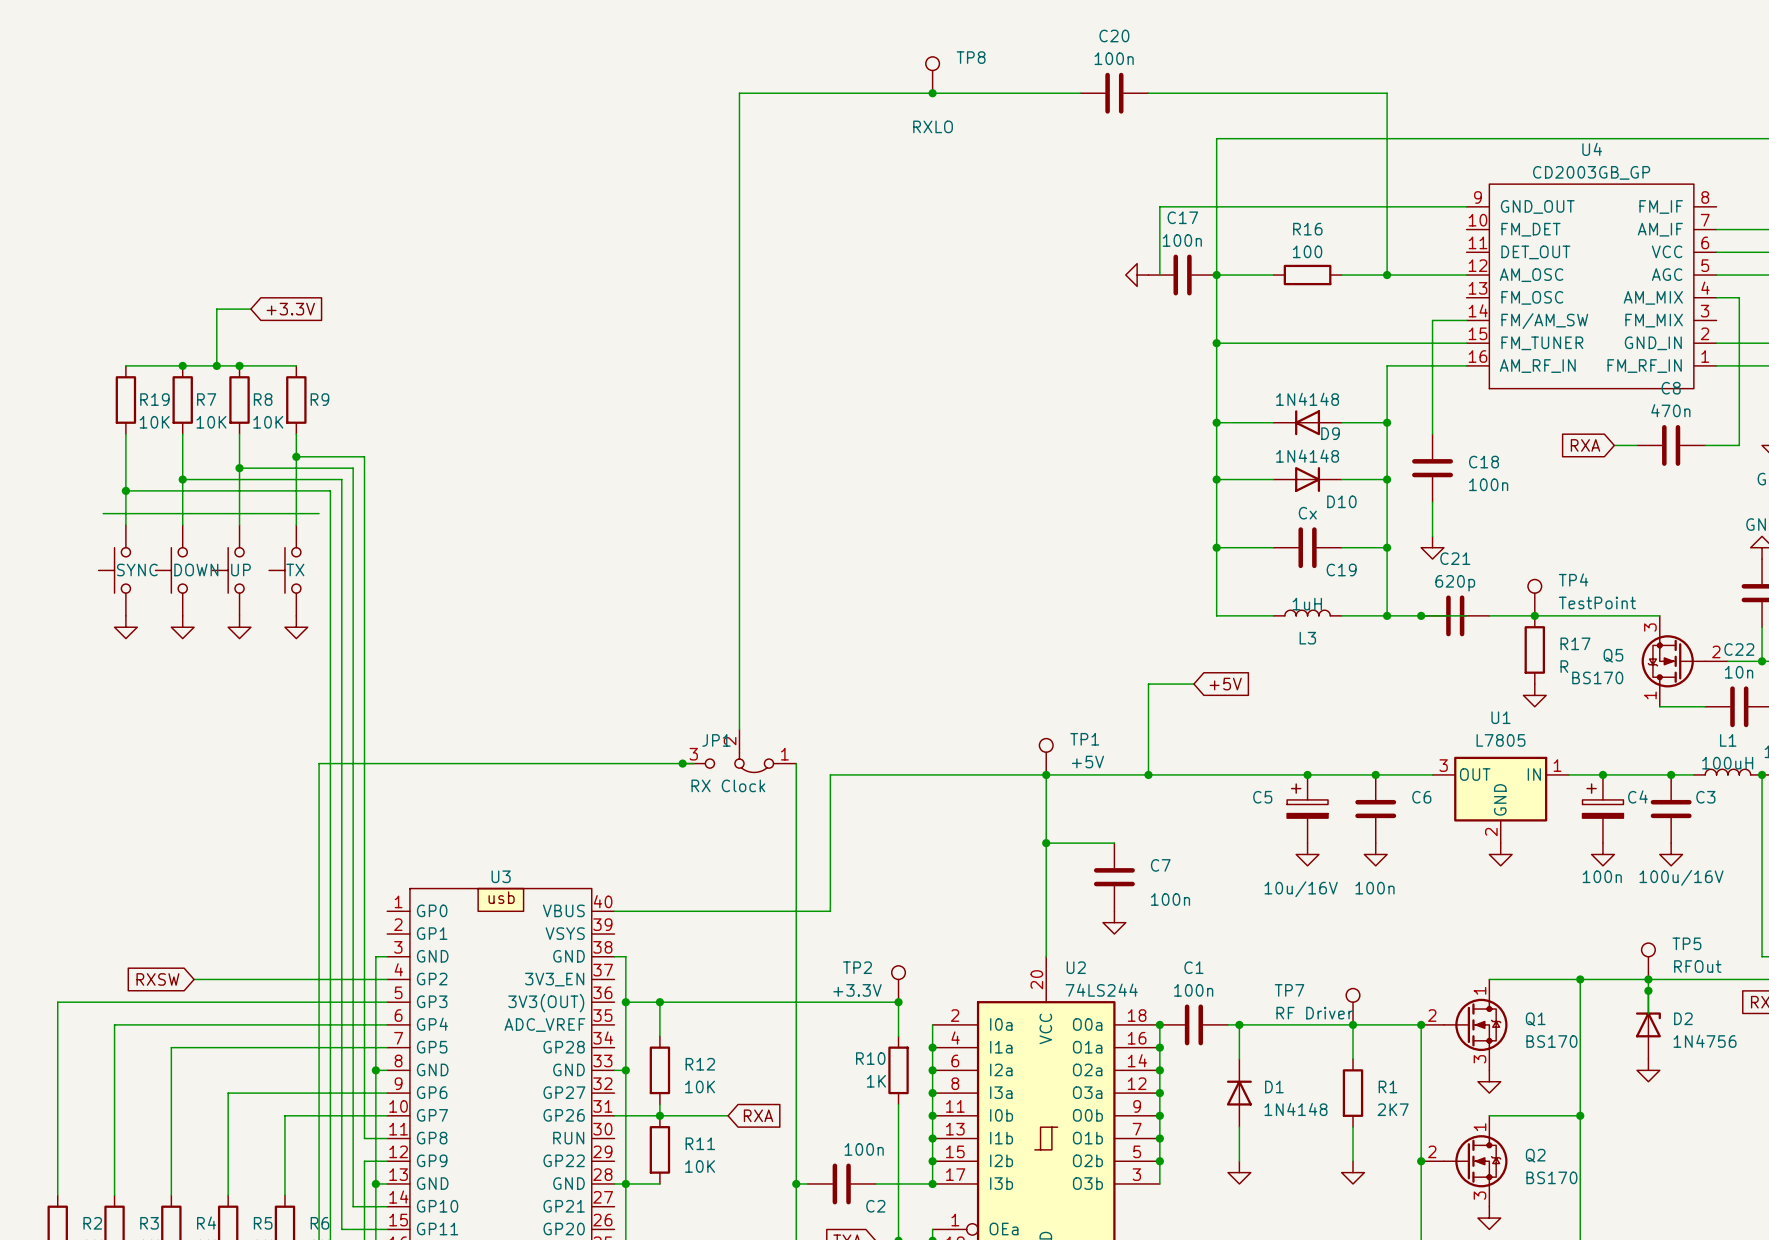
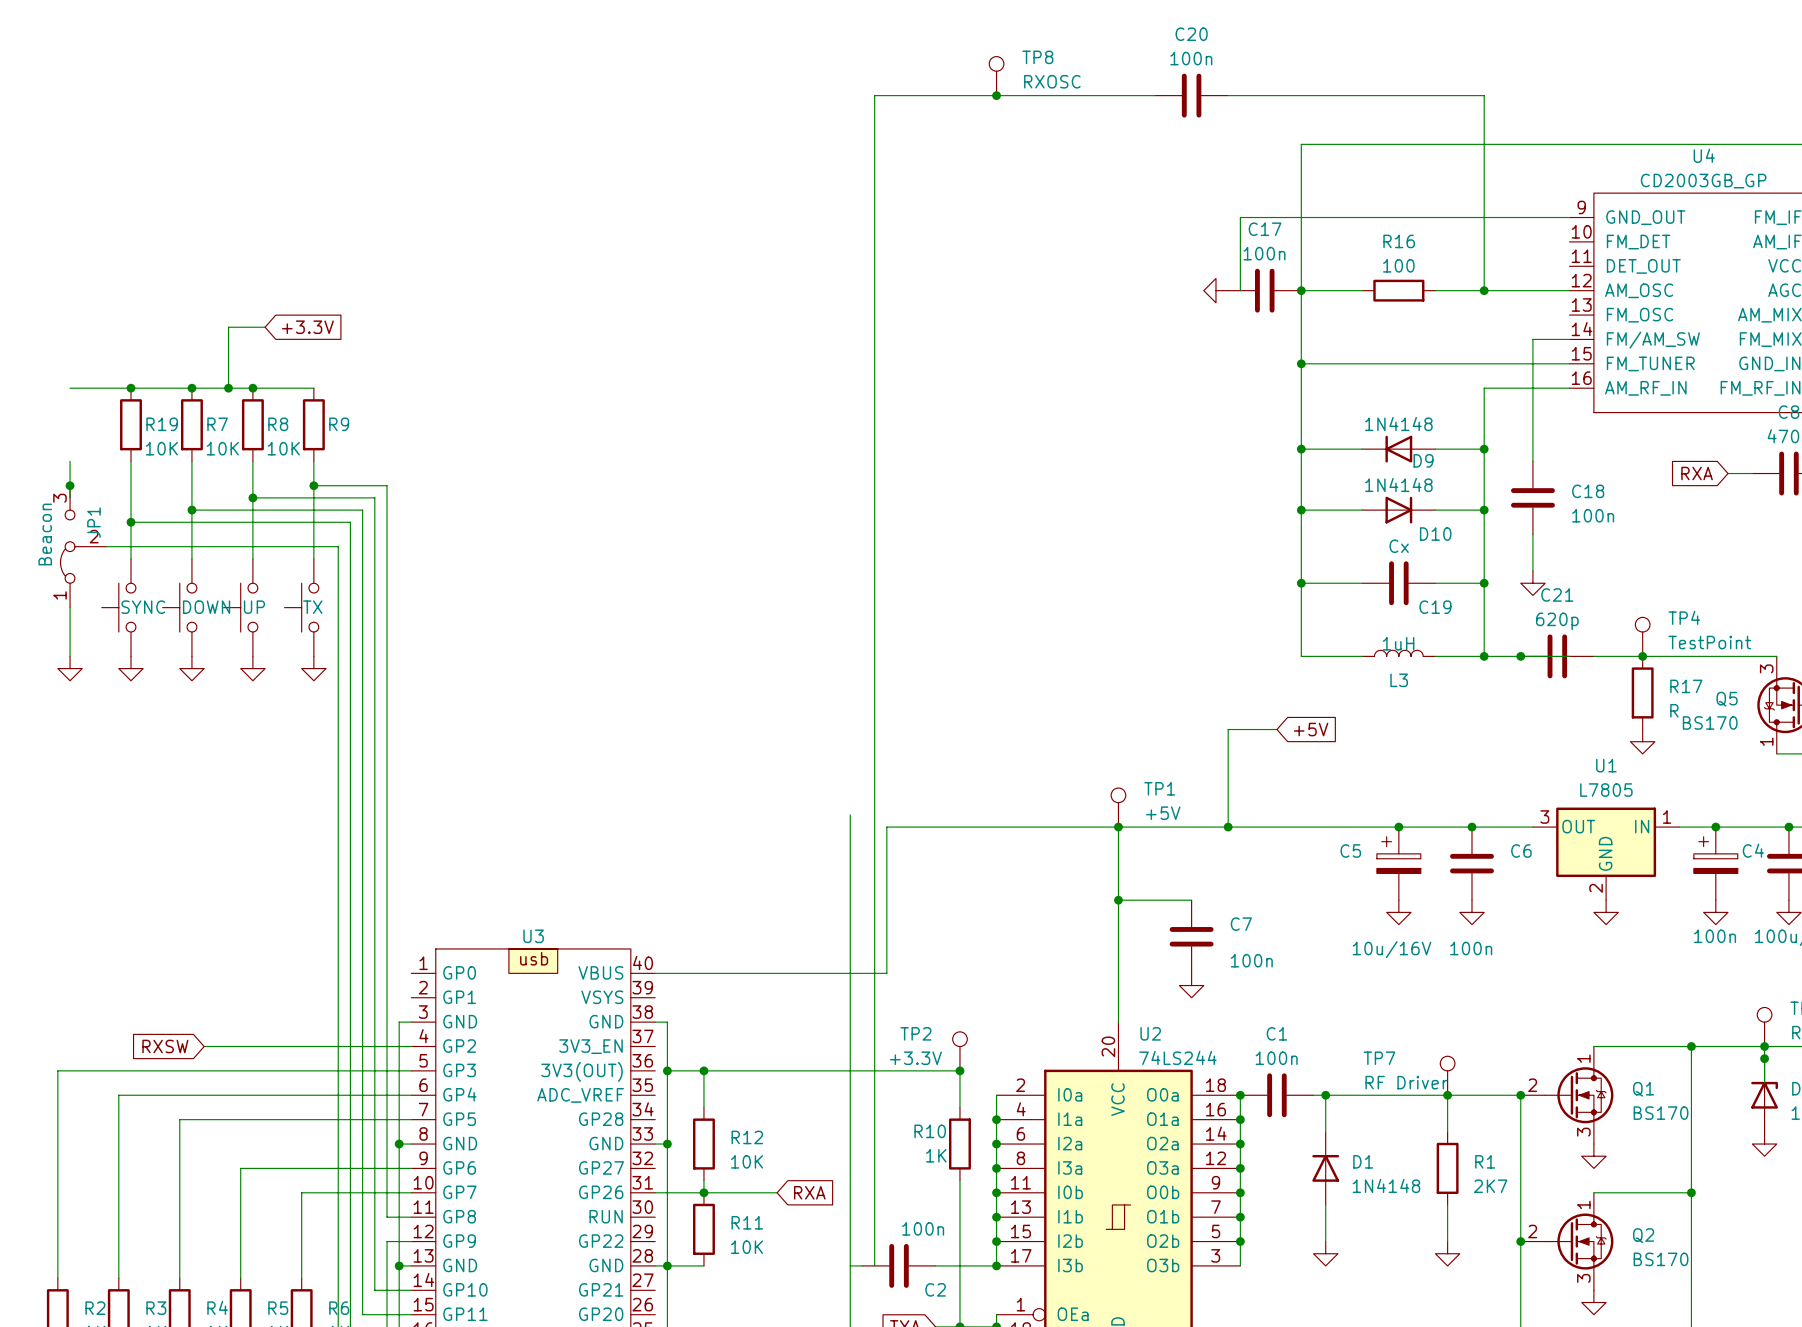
wire: (818, 93) (739, 93) (739, 729) -> (874, 95) (874, 1265)
TP8 value: RXLO (933, 126) -> RXOSC (1052, 81)
wire: none -> (70, 388) (131, 388)
junction: none -> (131, 388)
wire: none -> (70, 461) (70, 497)
junction: none -> (70, 485)
wire: none -> (70, 607) (70, 656)
power symbol: none -> (70, 668)
JP1 position: (739, 750) -> (83, 546)
JP1 rotation: 0° (739, 762) -> 90° clockwise (71, 546)
wire: (319, 763) (694, 763) -> (338, 814) (338, 546)
junction: (682, 763) -> none
JP1 value: RX Clock (728, 785) -> Beacon (45, 534)
junction: (796, 1183) -> none

